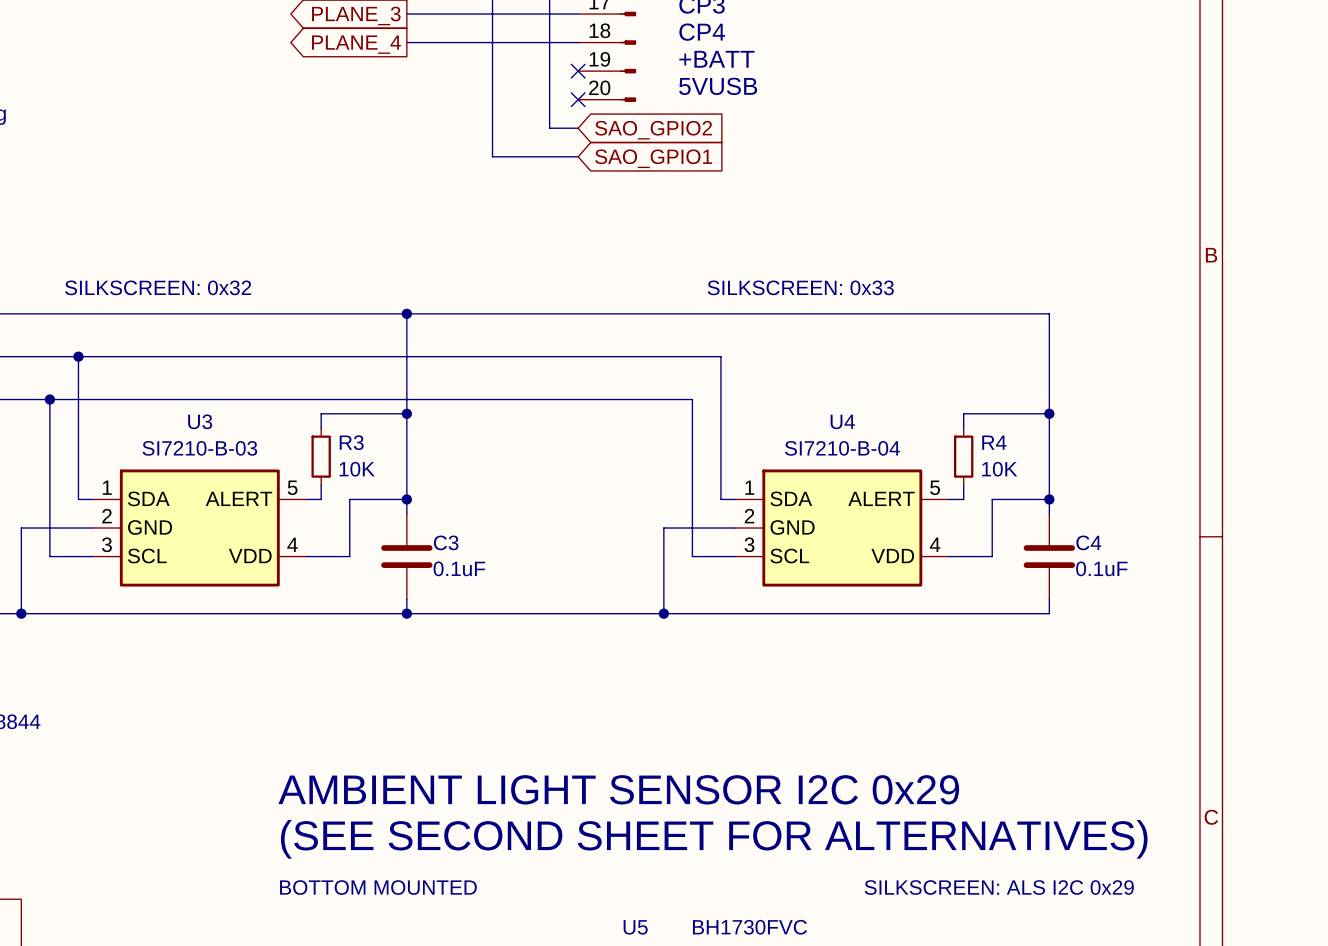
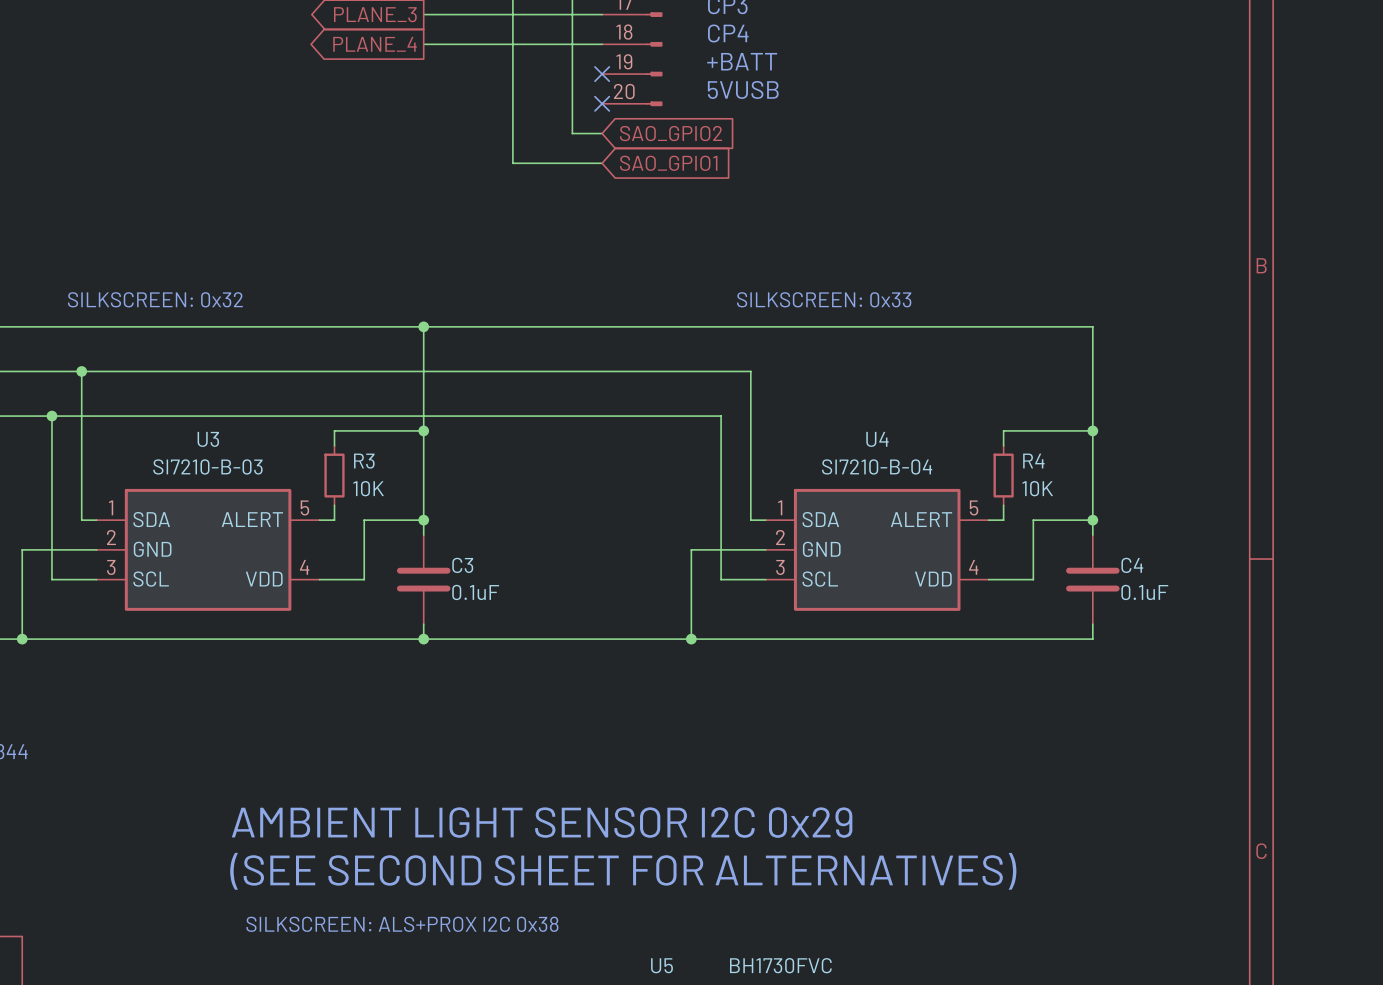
text position: AMBIENT LIGHT SENSOR I2C 0x29 (618, 789) -> AMBIENT LIGHT SENSOR I2C 0x29 (542, 822)
text position: (SEE SECOND SHEET FOR ALTERNATIVES) (714, 839) -> (SEE SECOND SHEET FOR ALTERNATIVES) (623, 871)
text: BOTTOM MOUNTED (378, 887) -> none
text: none -> SILKSCREEN: ALS+PROX I2C 0x38 (402, 924)
text: SILKSCREEN: ALS I2C 0x29 (999, 887) -> none

